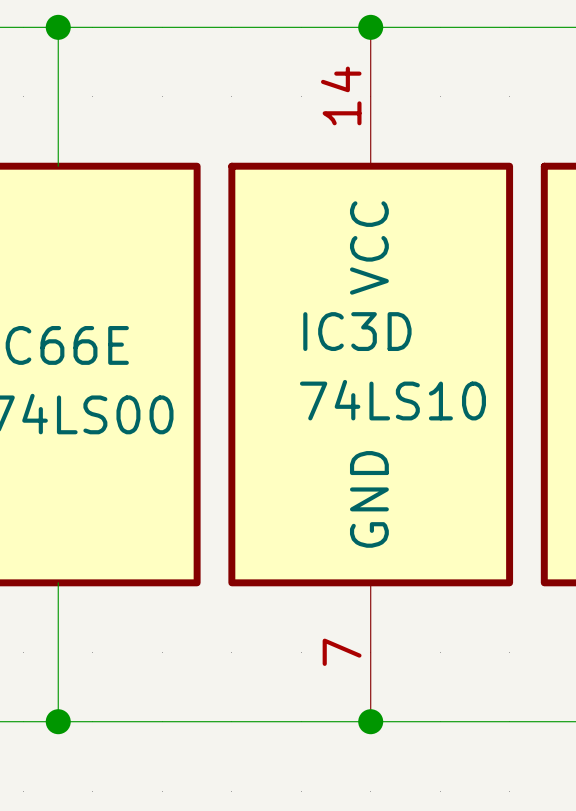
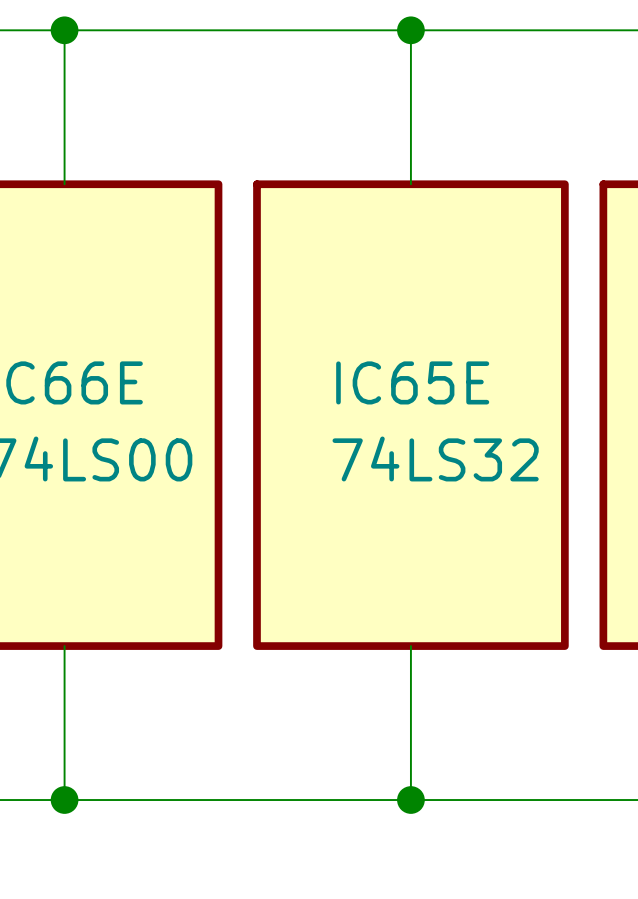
IC3D: 74LS10 (370, 374) -> none
IC65E: none -> 74LS32 (410, 415)

